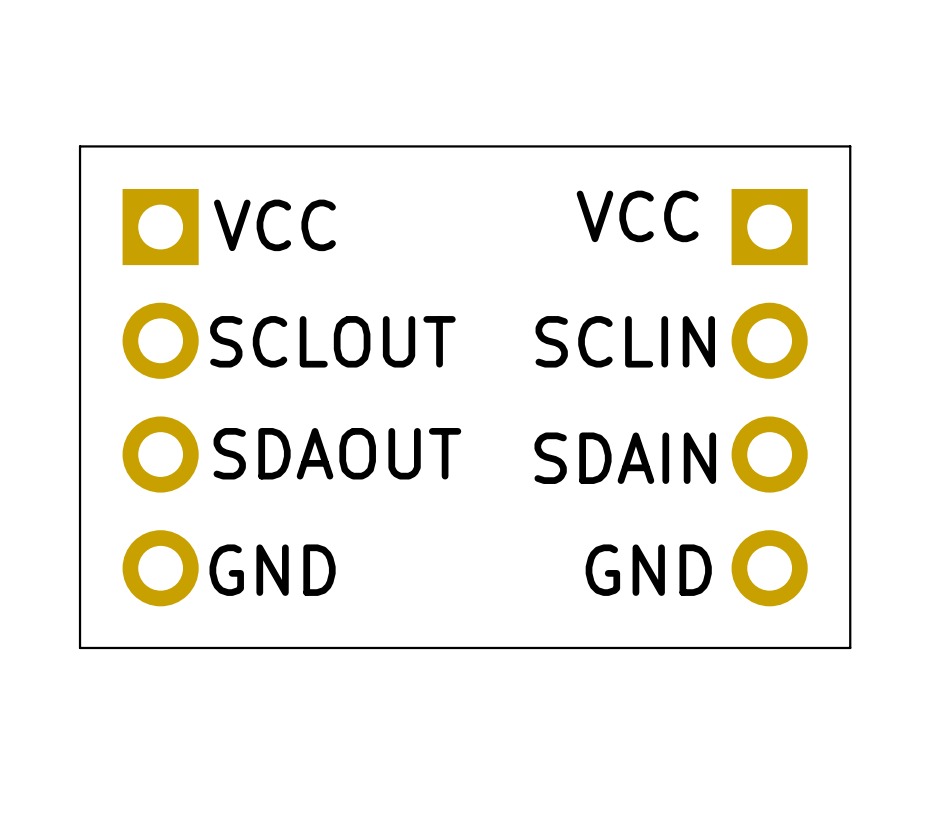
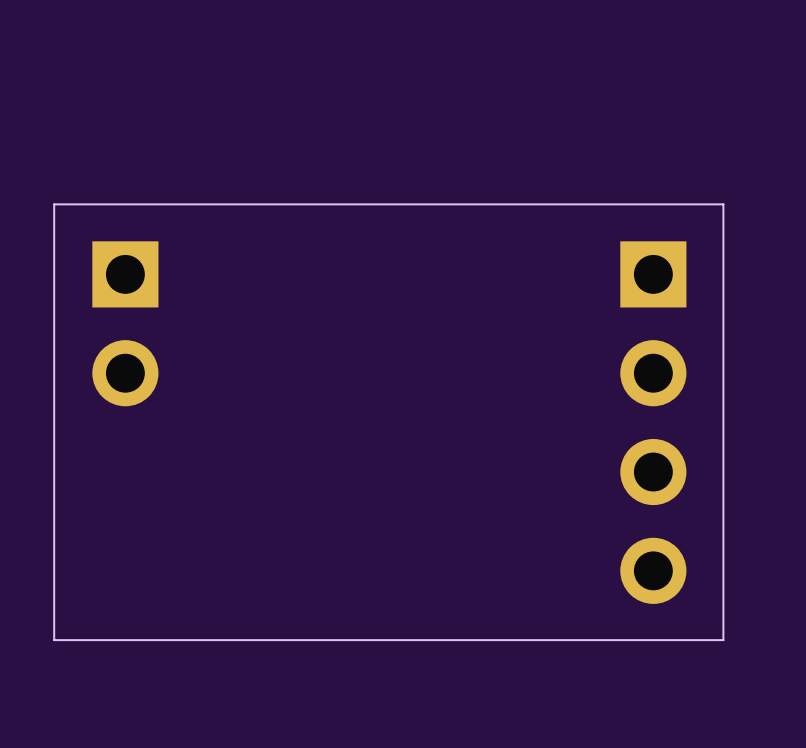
text: VCC (637, 216) -> none
text: VCC (274, 225) -> none
part: none -> (125, 323)
text: SCLOUT (332, 341) -> none
text: SCLIN (625, 341) -> none
part: (160, 397) -> none
text: SDAOUT (337, 453) -> none
text: SDAIN (625, 458) -> none
text: GND (272, 570) -> none
text: GND (648, 570) -> none

